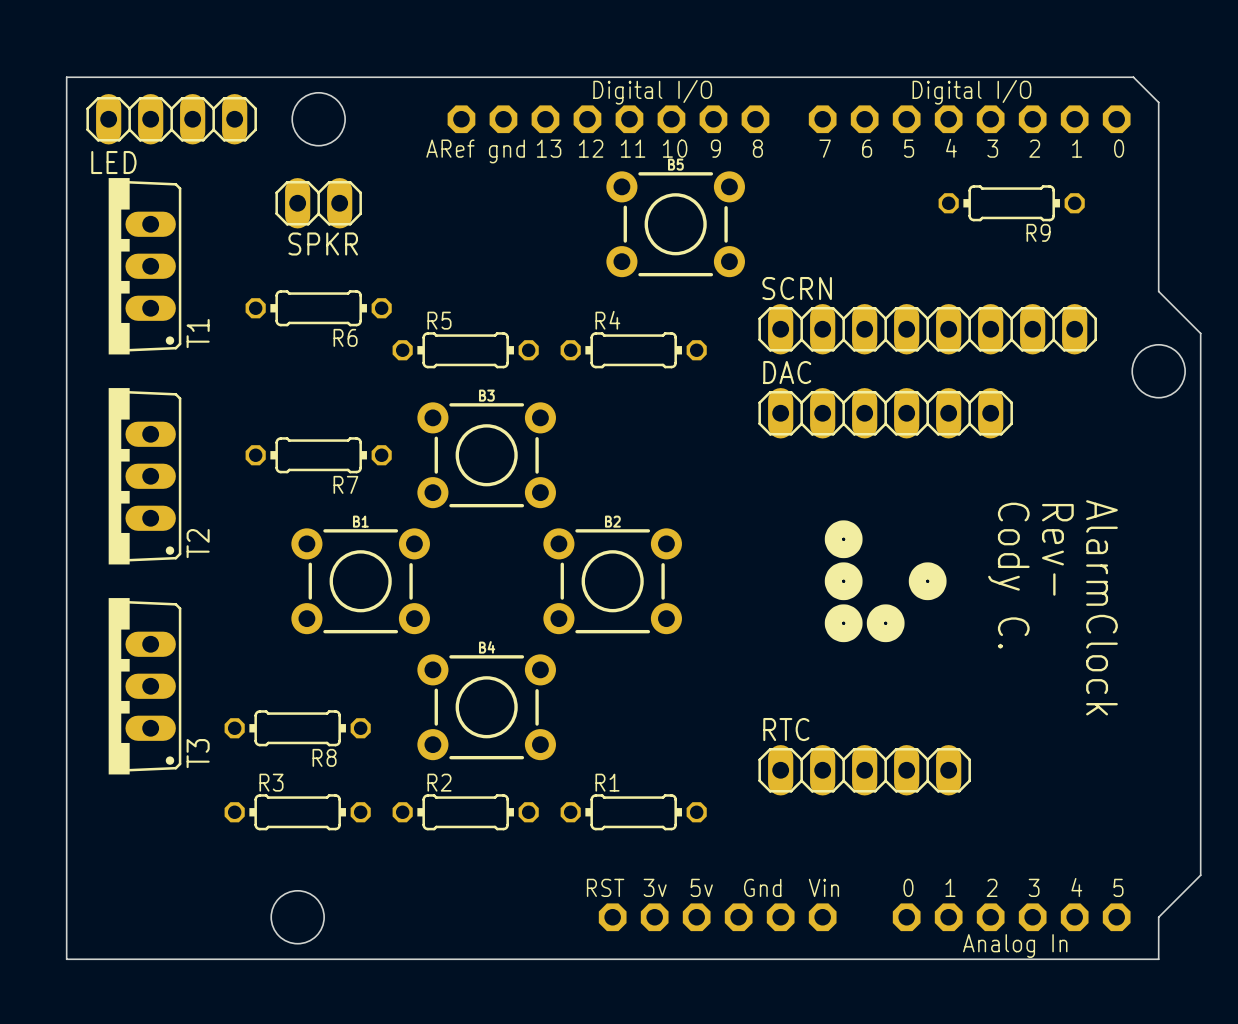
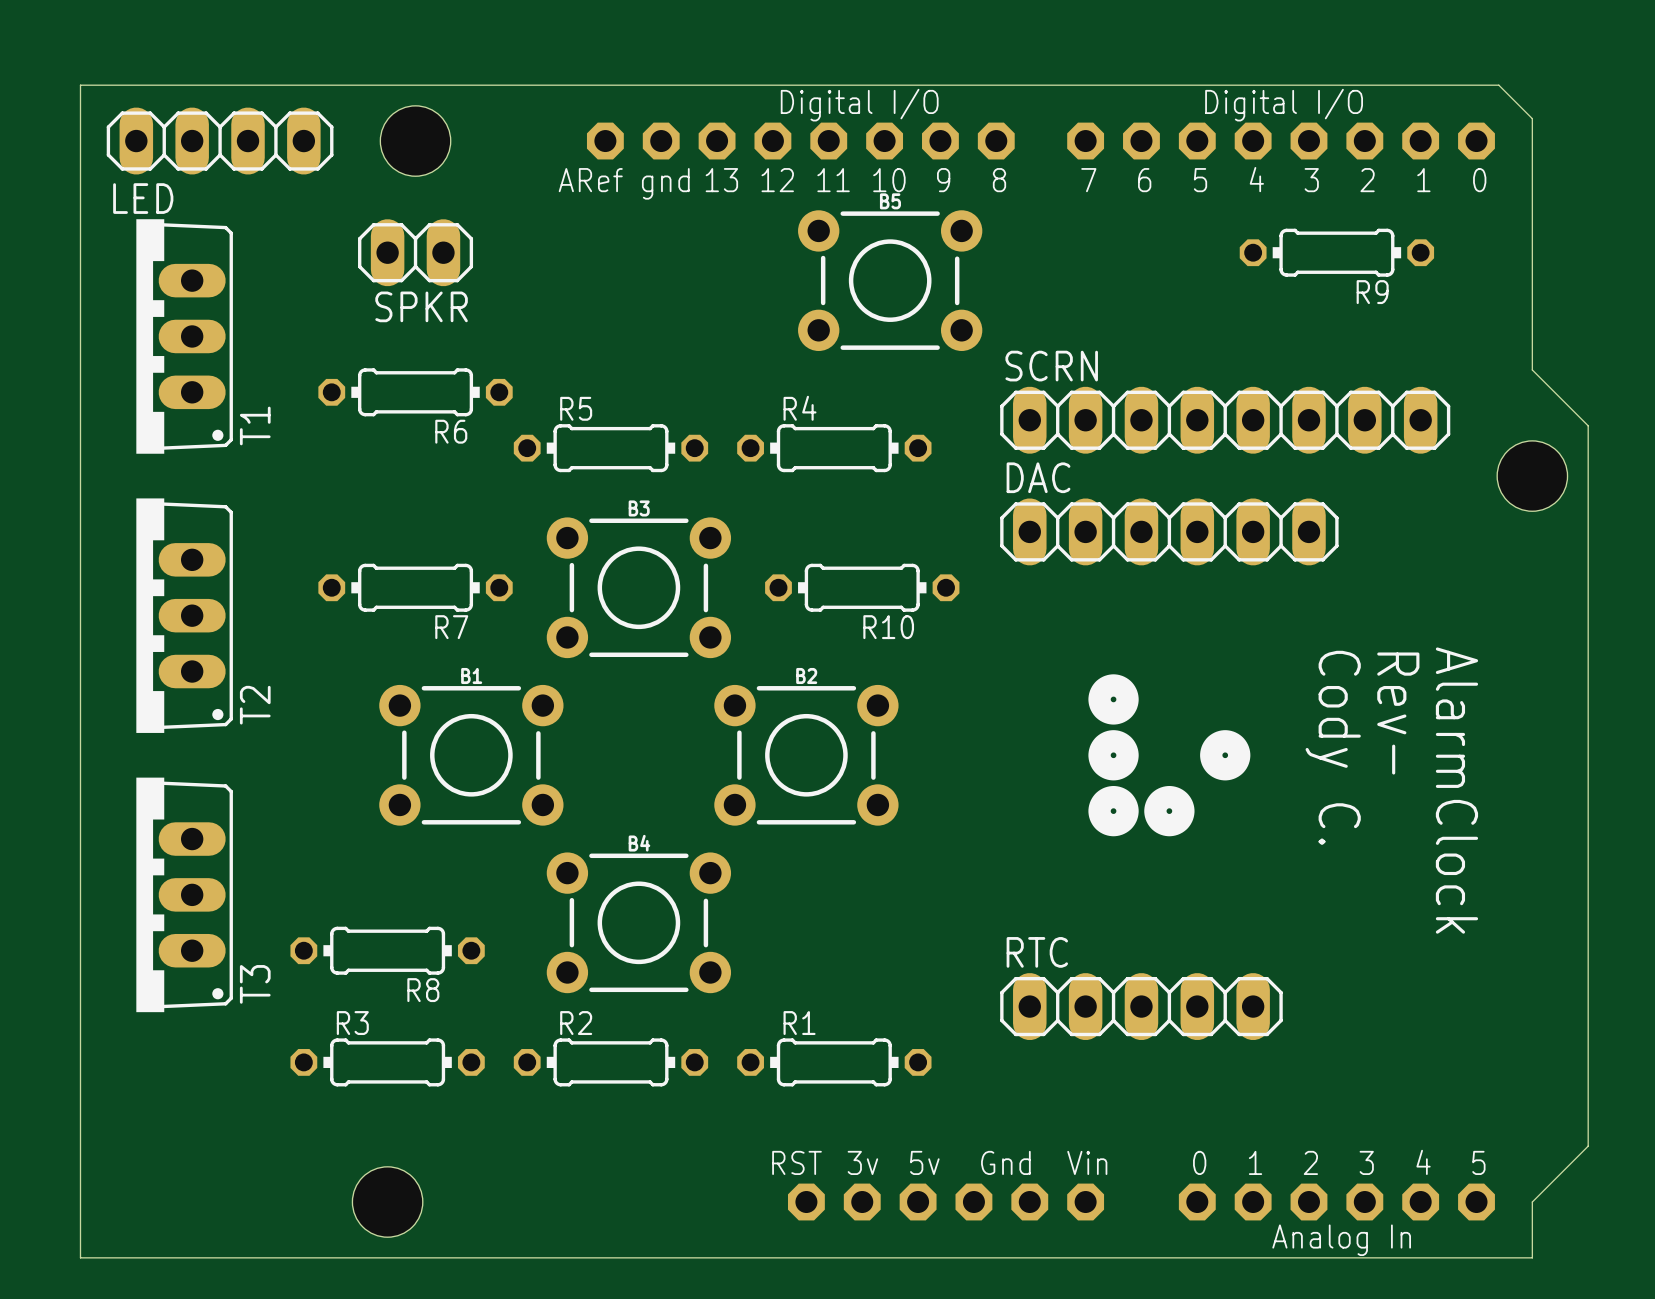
R10: none -> (862, 587)

